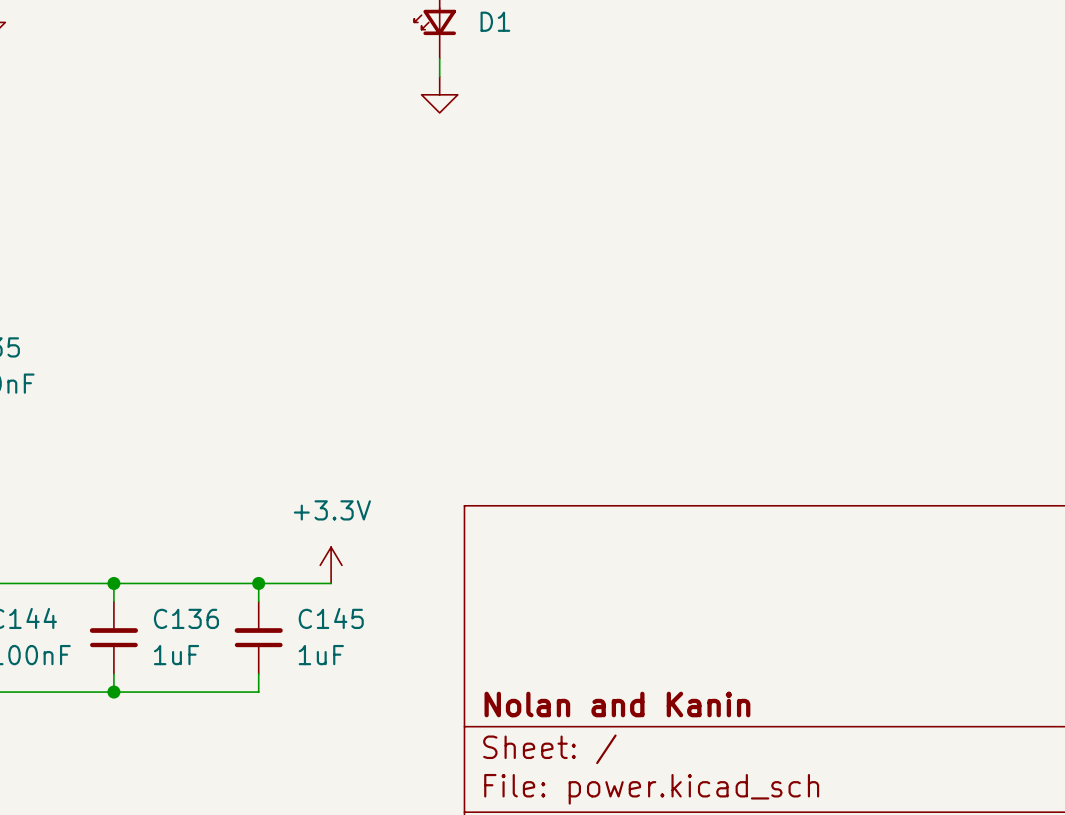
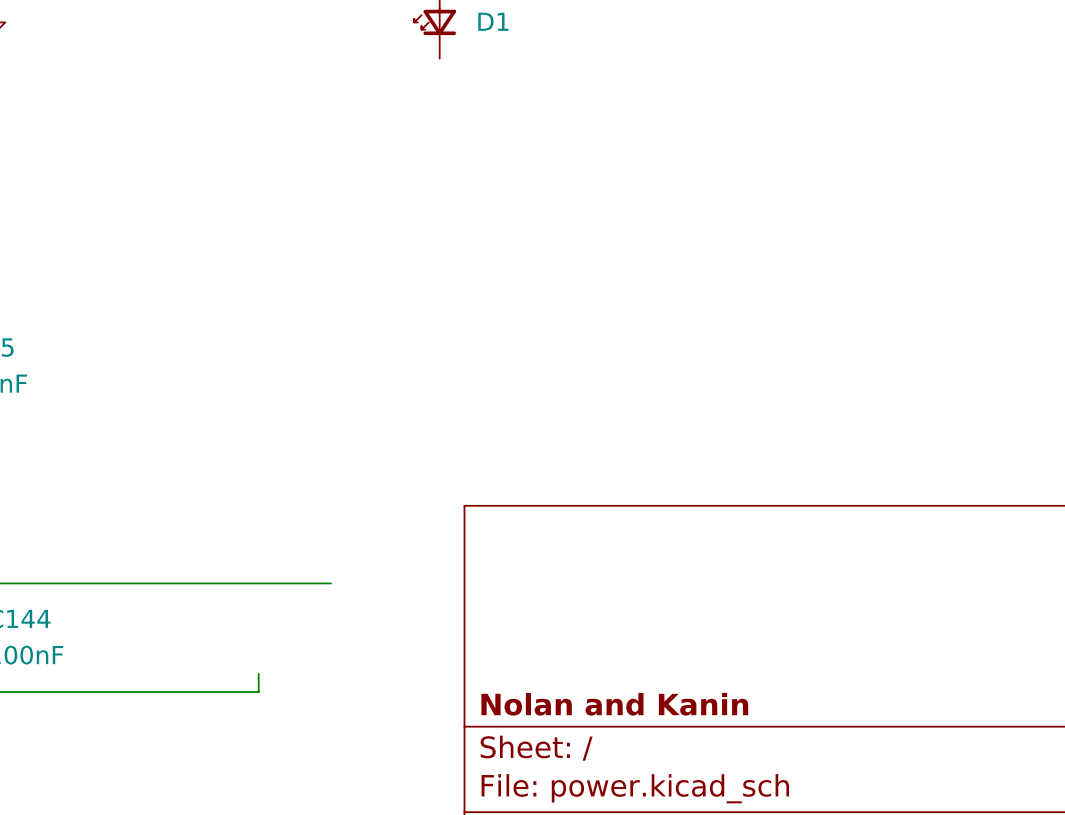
wire: (439, 58) (439, 76) -> none
power symbol: (439, 94) -> none
power symbol: +3.3V (331, 565) -> none
wire: (113, 583) (113, 601) -> none
junction: (113, 583) -> none
wire: (258, 583) (258, 601) -> none
junction: (258, 583) -> none
C136: 1uF (113, 637) -> none
C145: 1uF (258, 637) -> none
wire: (113, 673) (113, 692) -> none
junction: (113, 692) -> none

